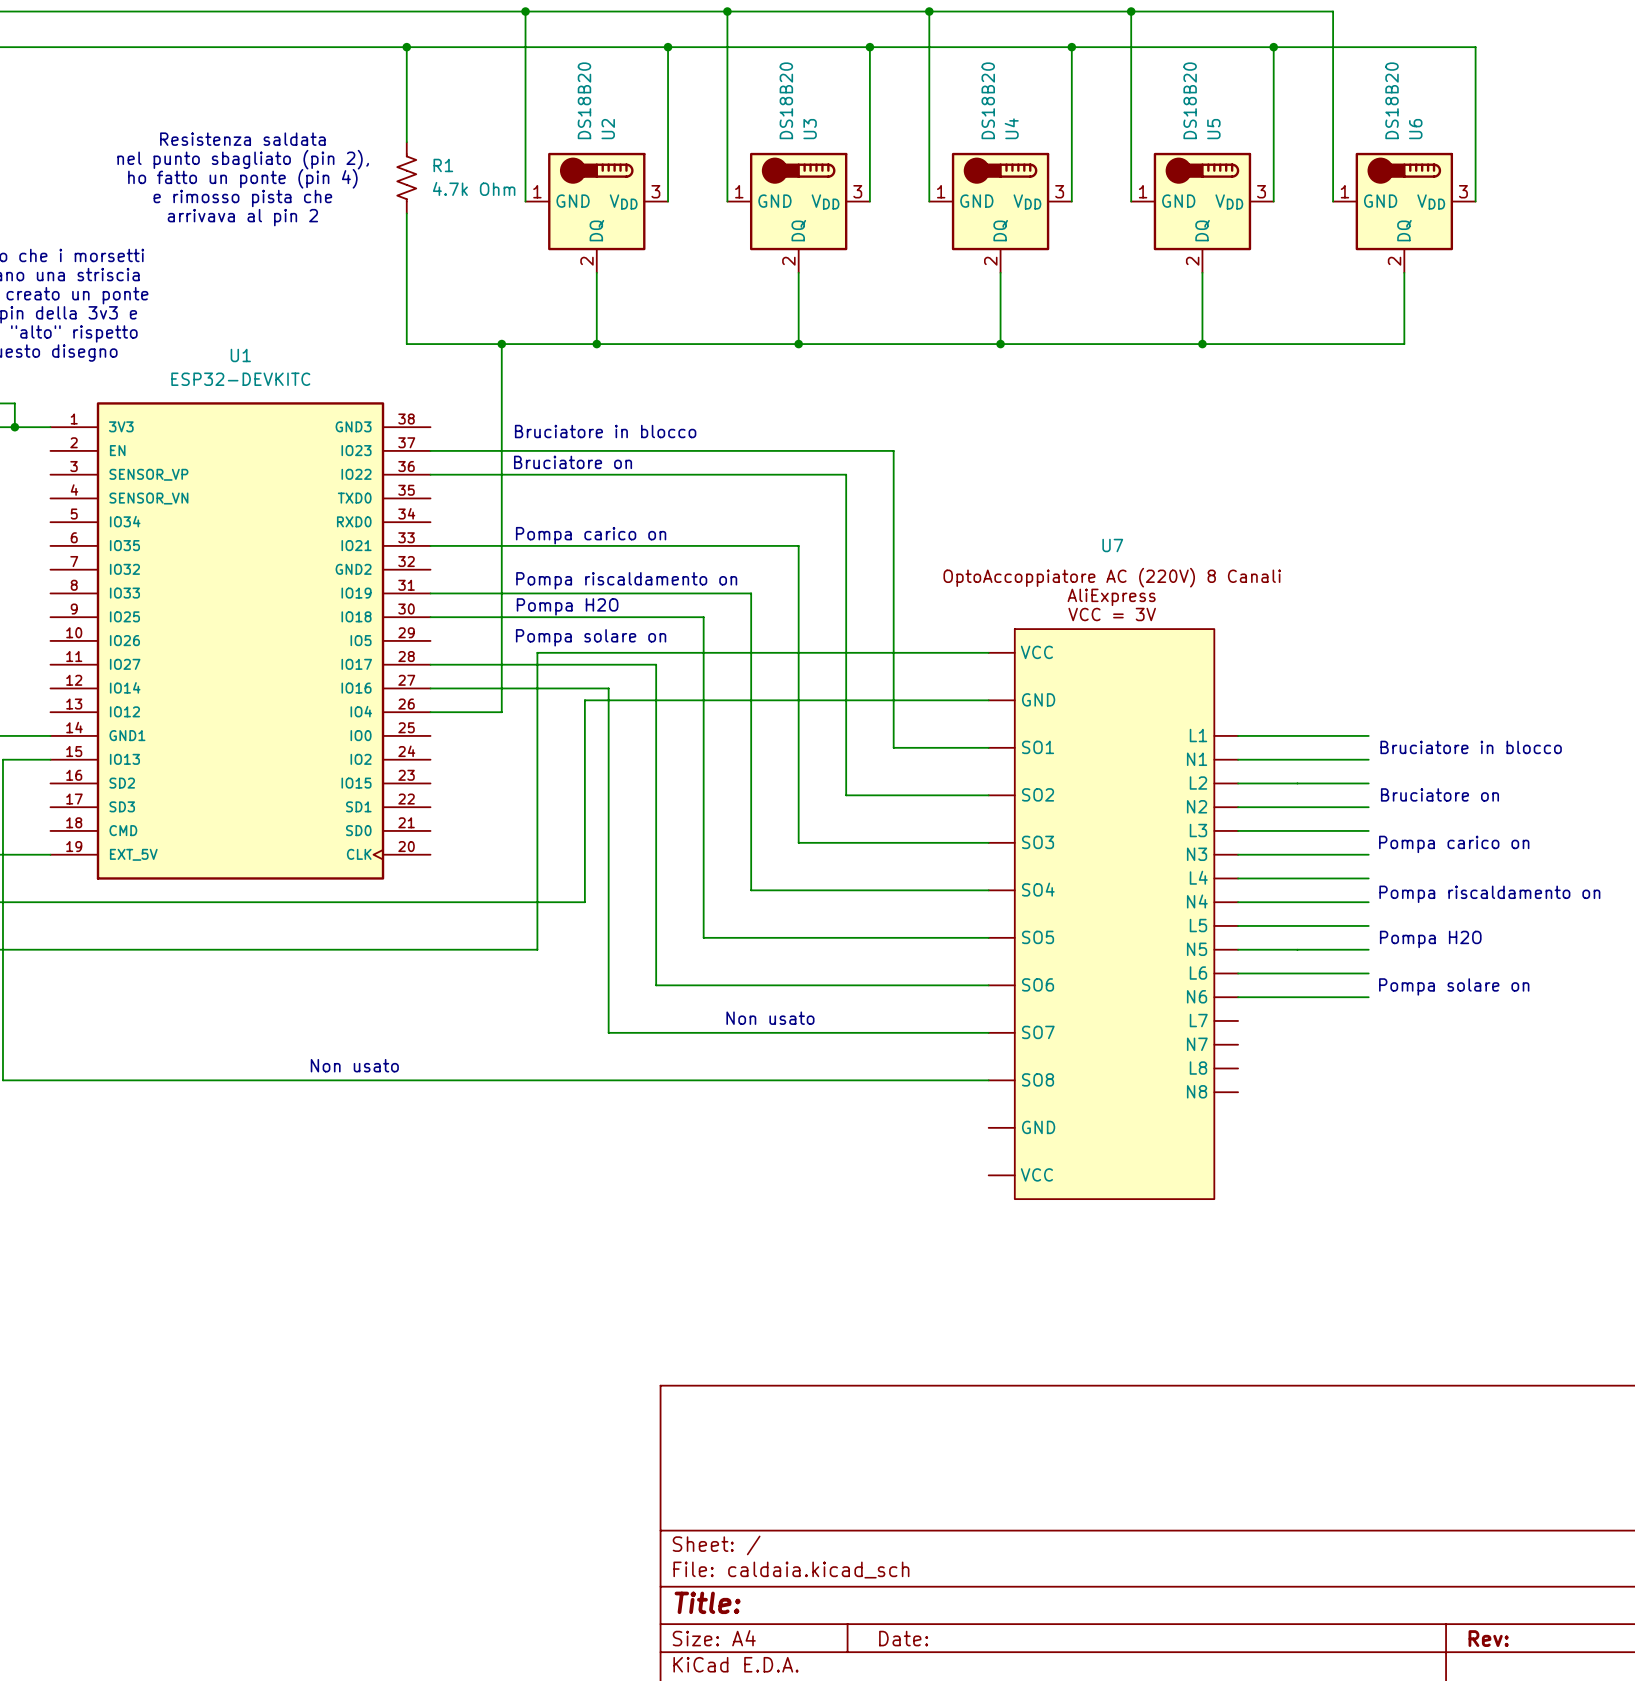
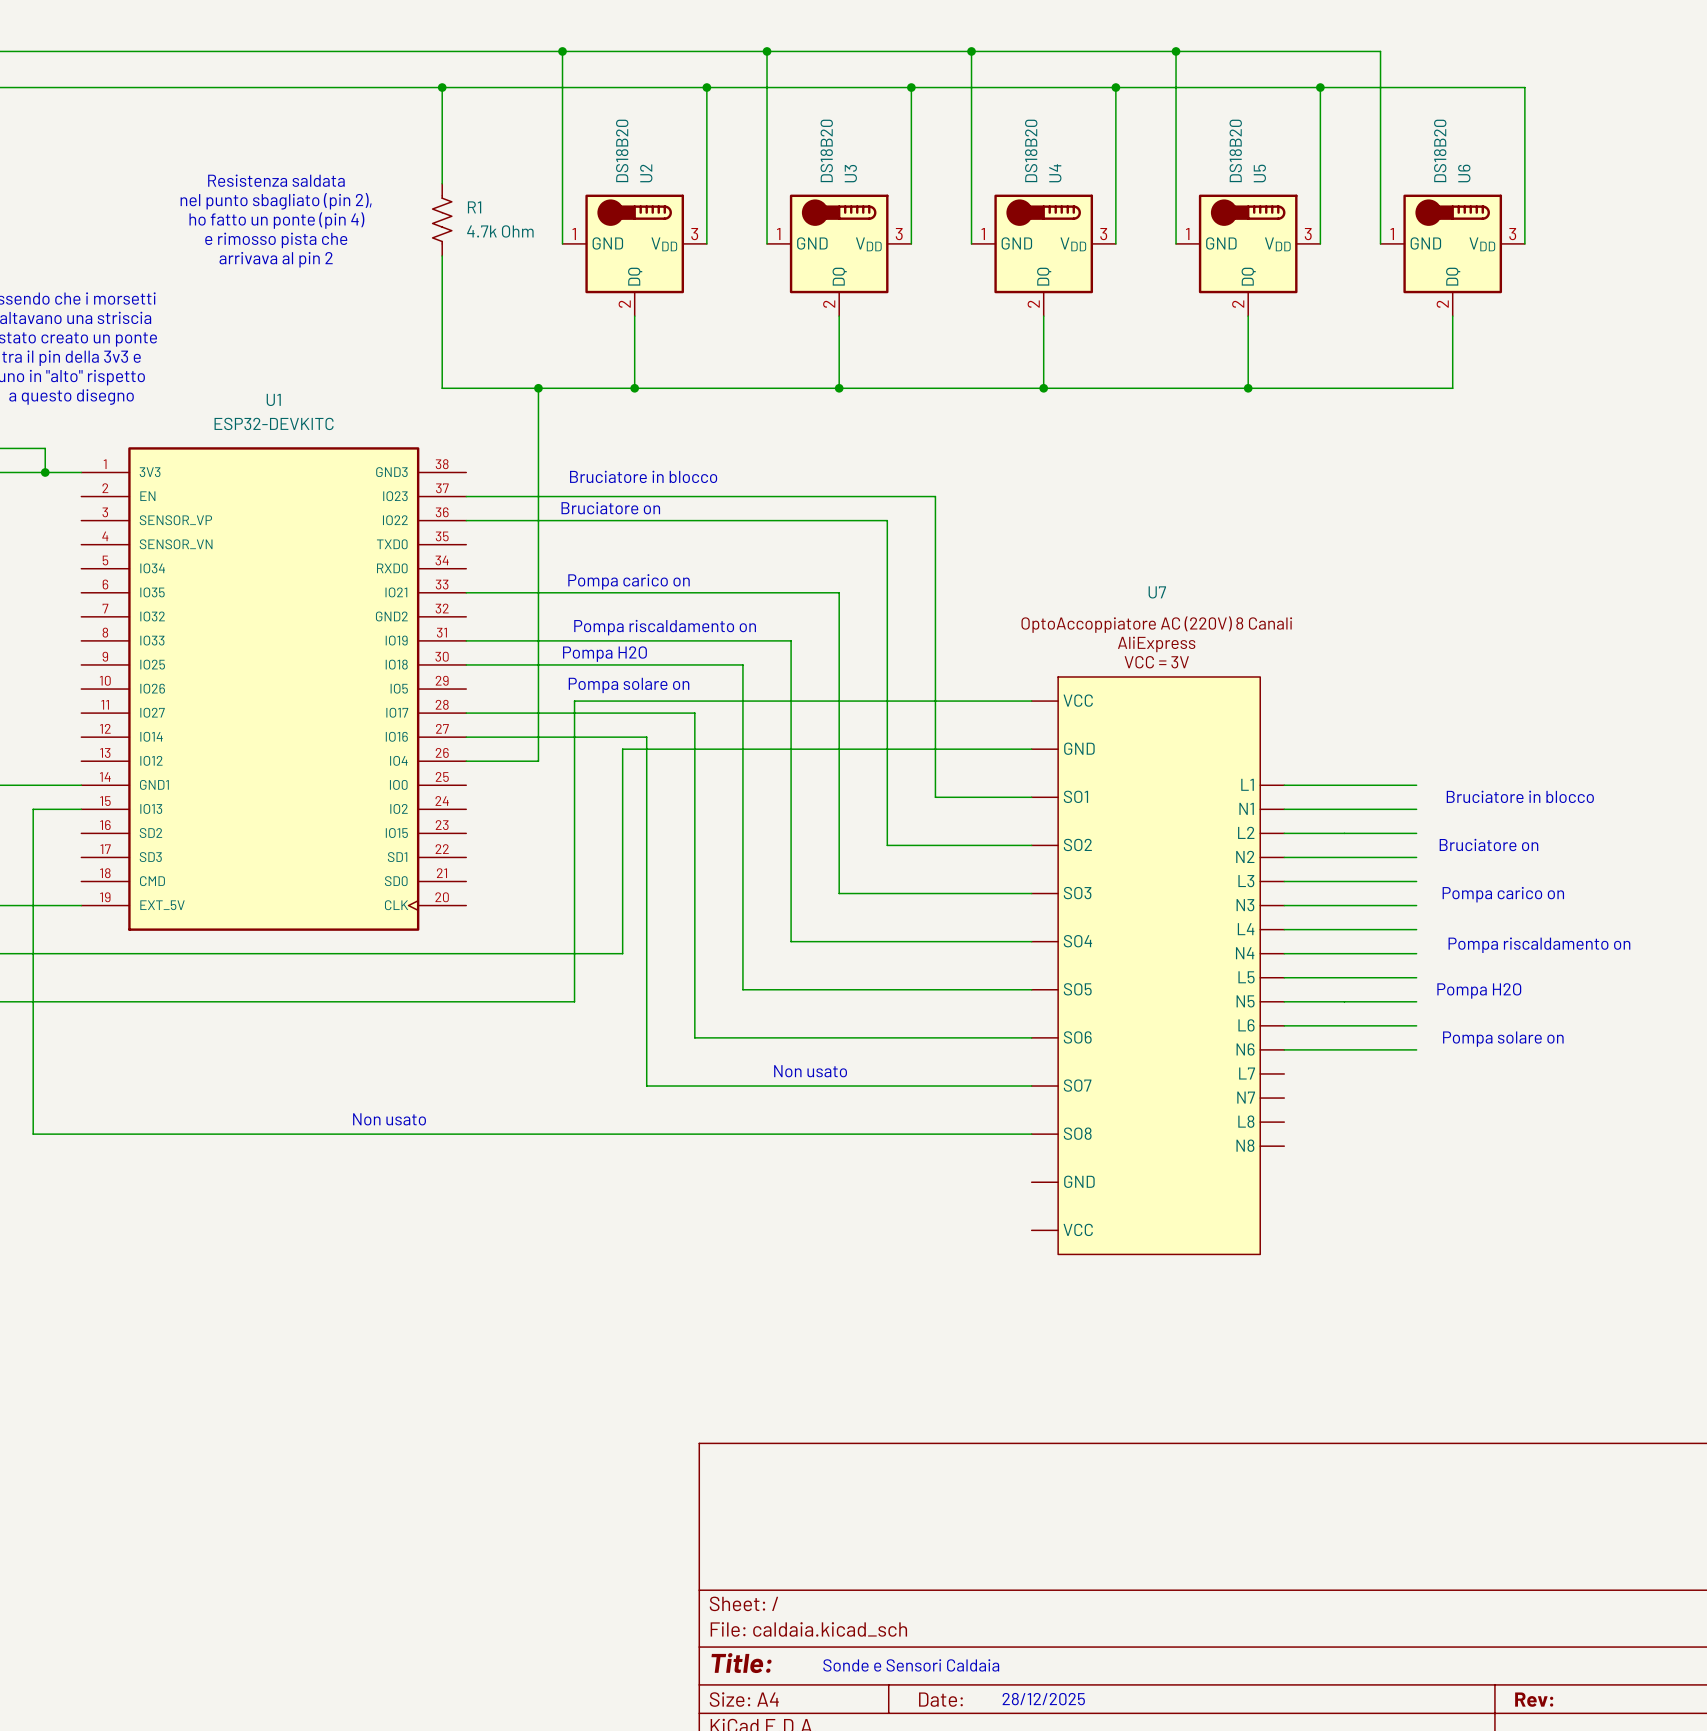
text: none -> Sonde e Sensori Caldaia (911, 1665)
text: none -> 28/12/2025 (1043, 1699)

